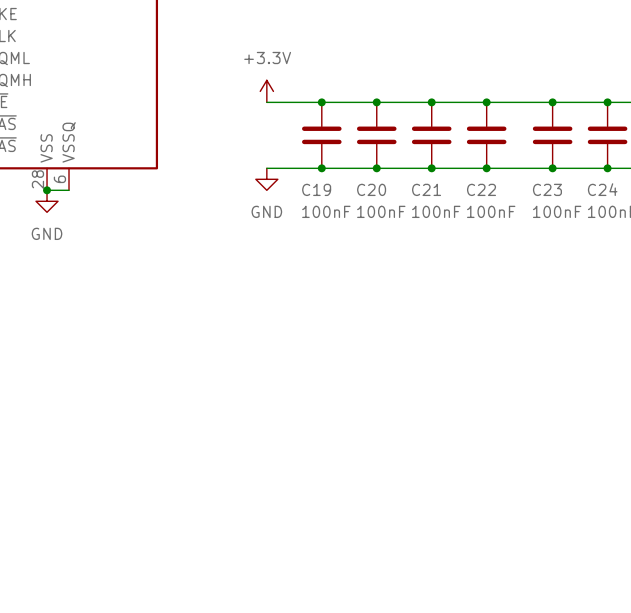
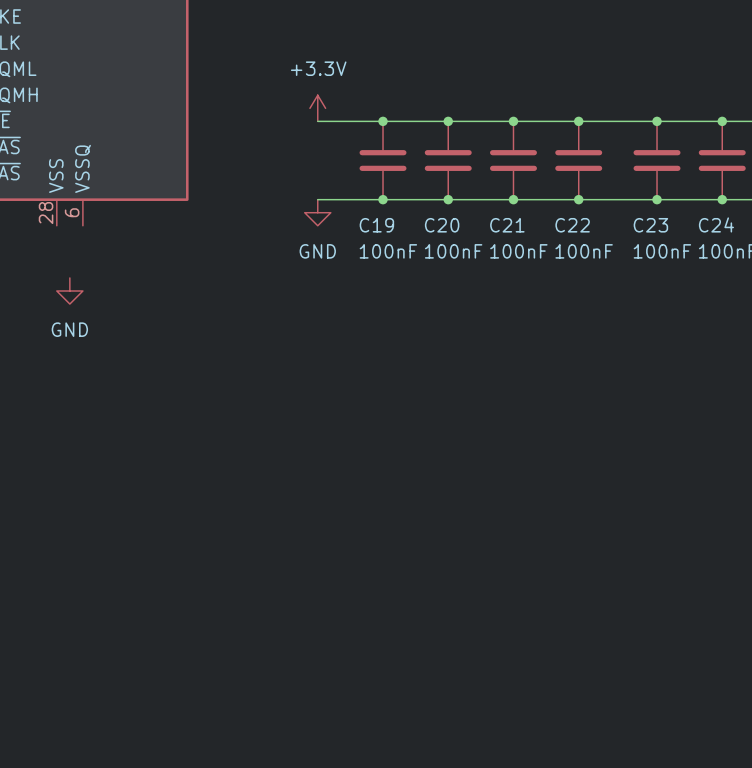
wire: (47, 190) (69, 190) -> none
junction: (47, 190) -> none
power symbol position: GND (47, 201) -> GND (69, 291)

